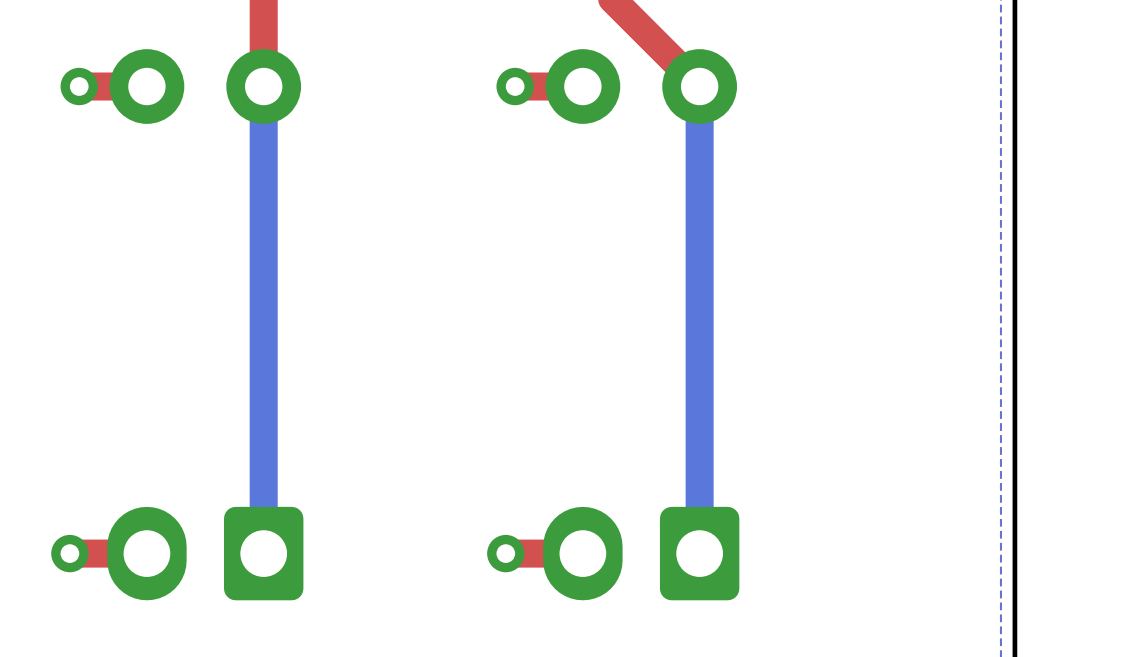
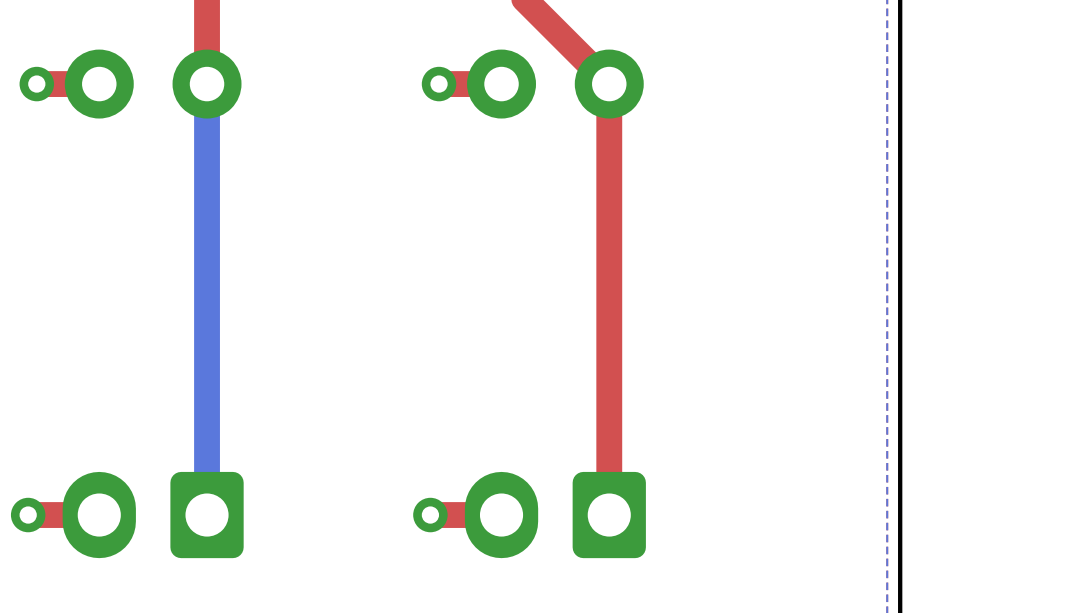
top track: none -> (609, 84) (609, 515)
bottom track: (699, 86) (699, 553) -> none

